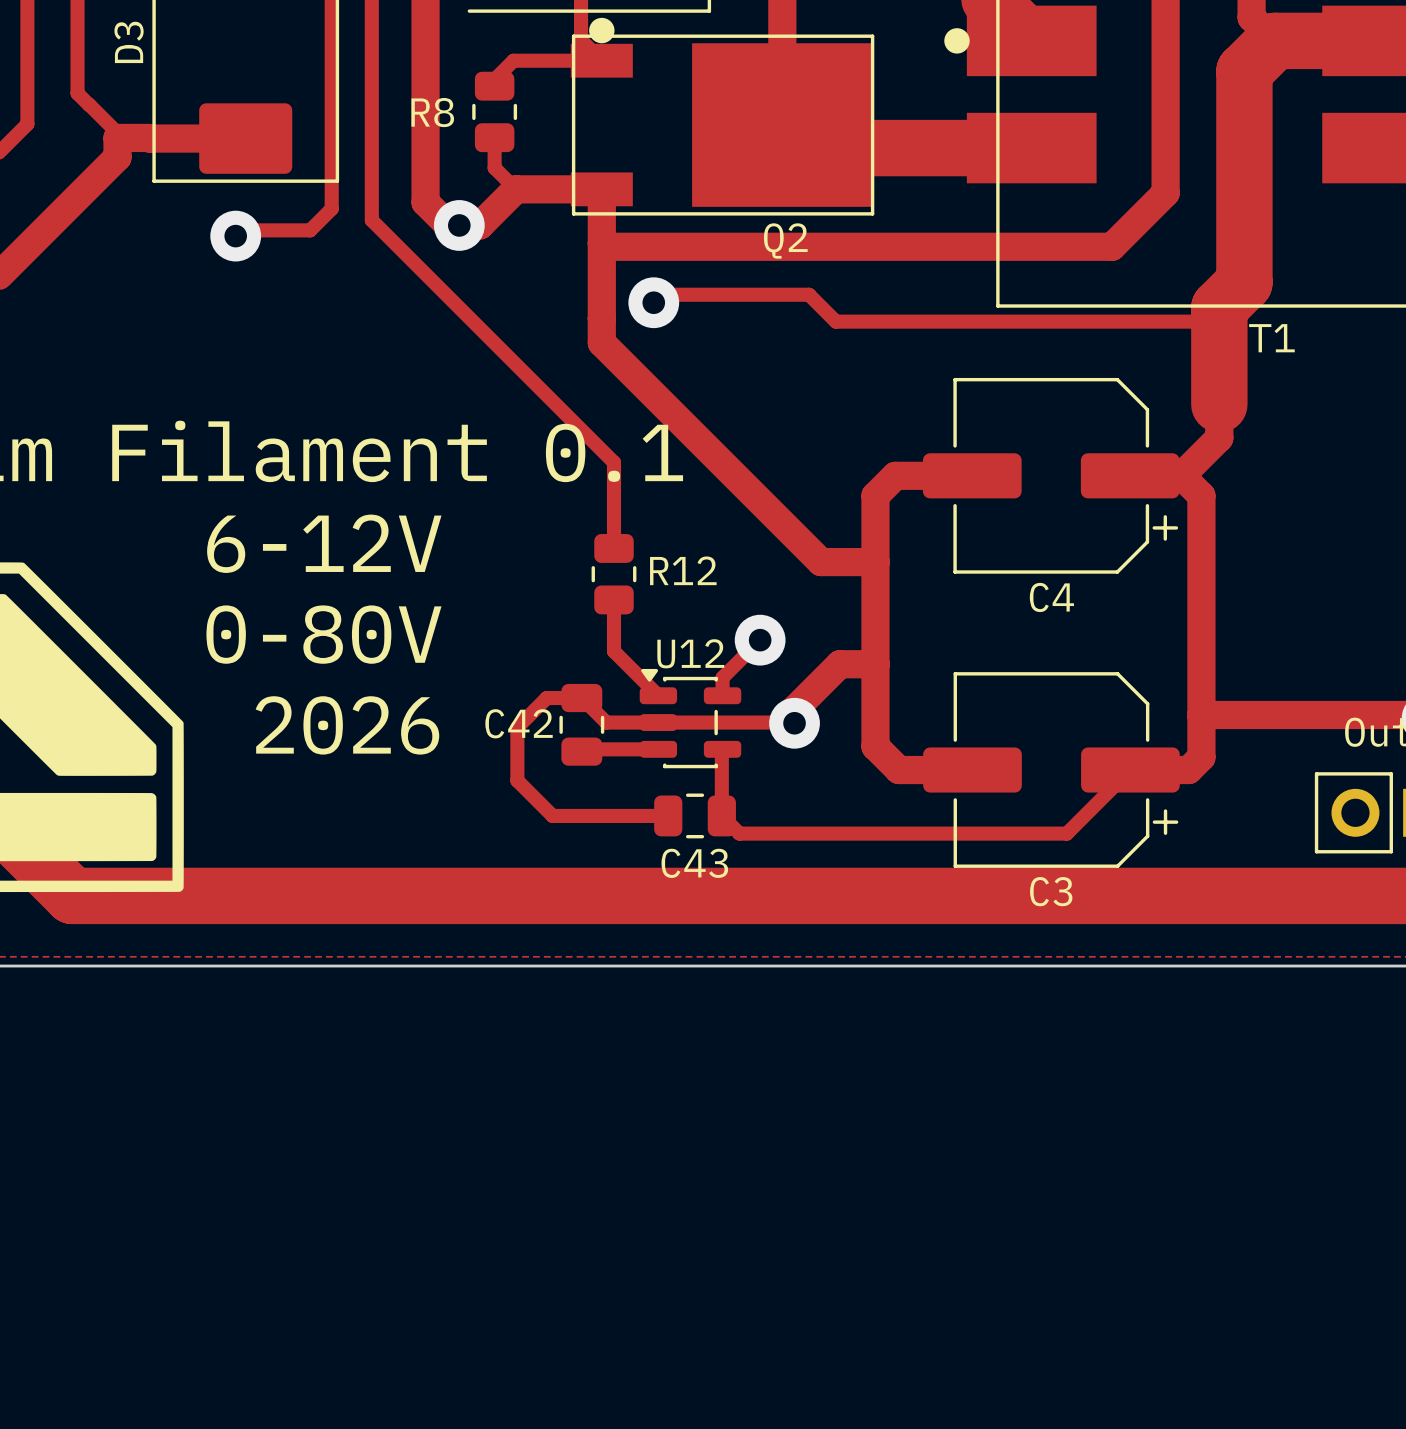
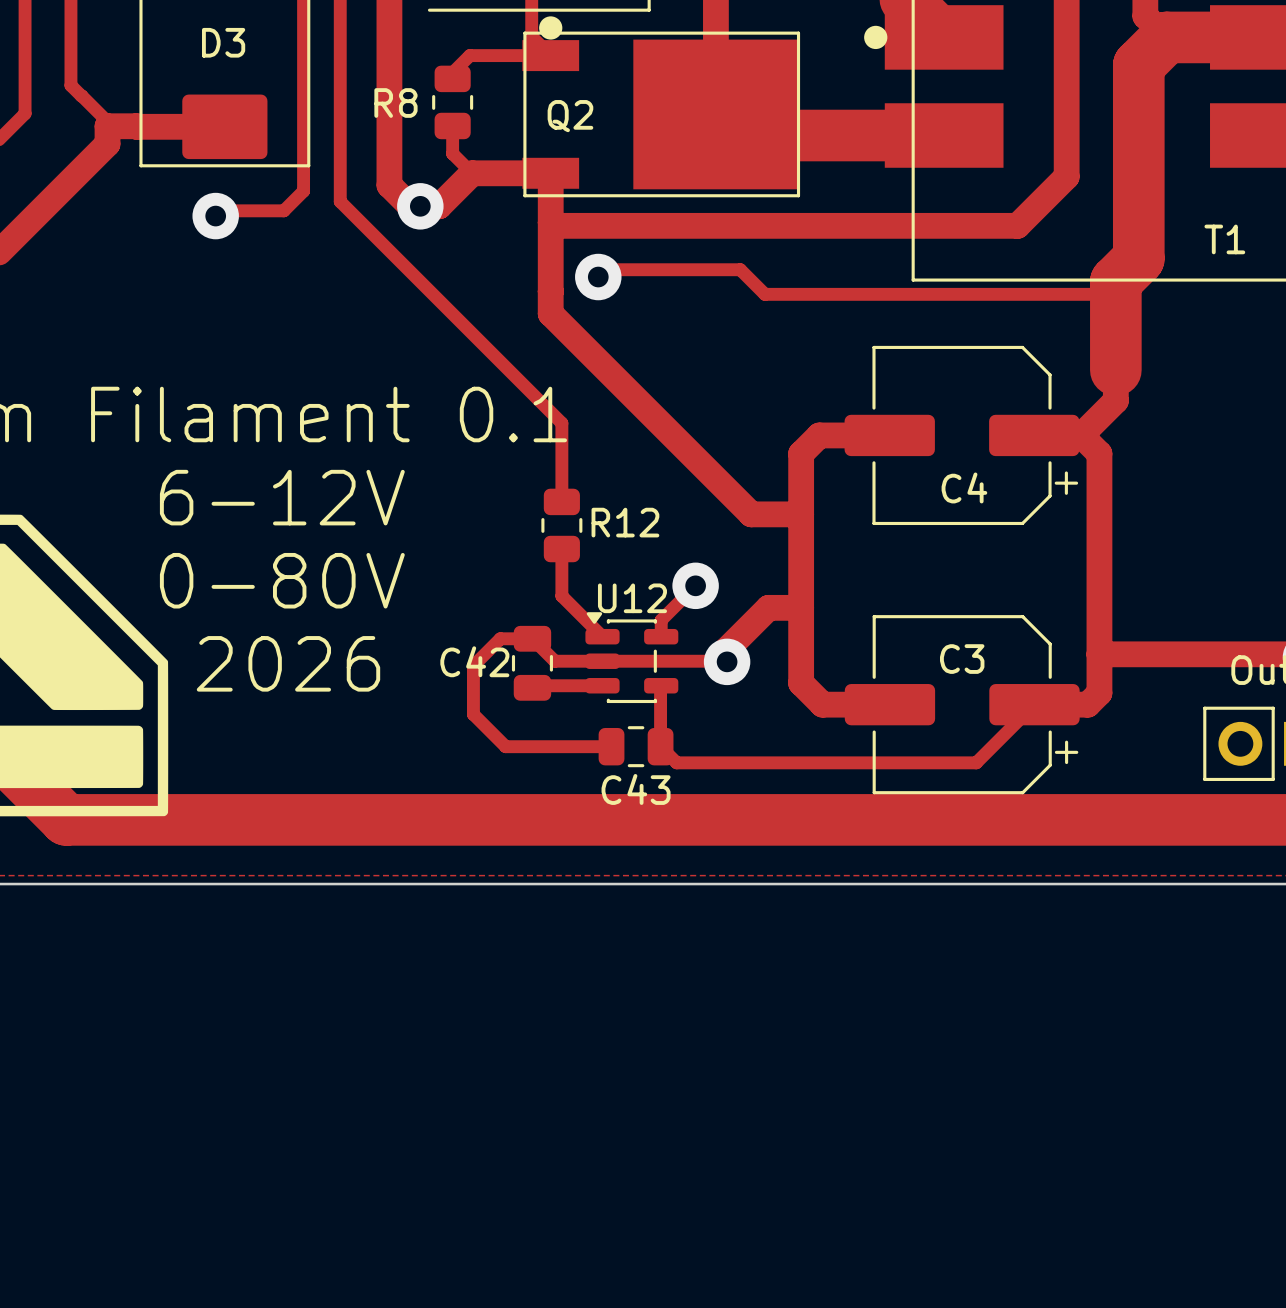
D3 name rotation: 0° (129, 42) -> 90° clockwise (223, 42)
D3 name position: D3 (129, 42) -> D3 (223, 42)
Q2 name position: Q2 (785, 240) -> Q2 (570, 116)
T1 name position: T1 (1271, 338) -> T1 (1224, 239)
C4 name position: C4 (1051, 597) -> C4 (964, 487)
C3 name position: C3 (1051, 891) -> C3 (962, 659)

